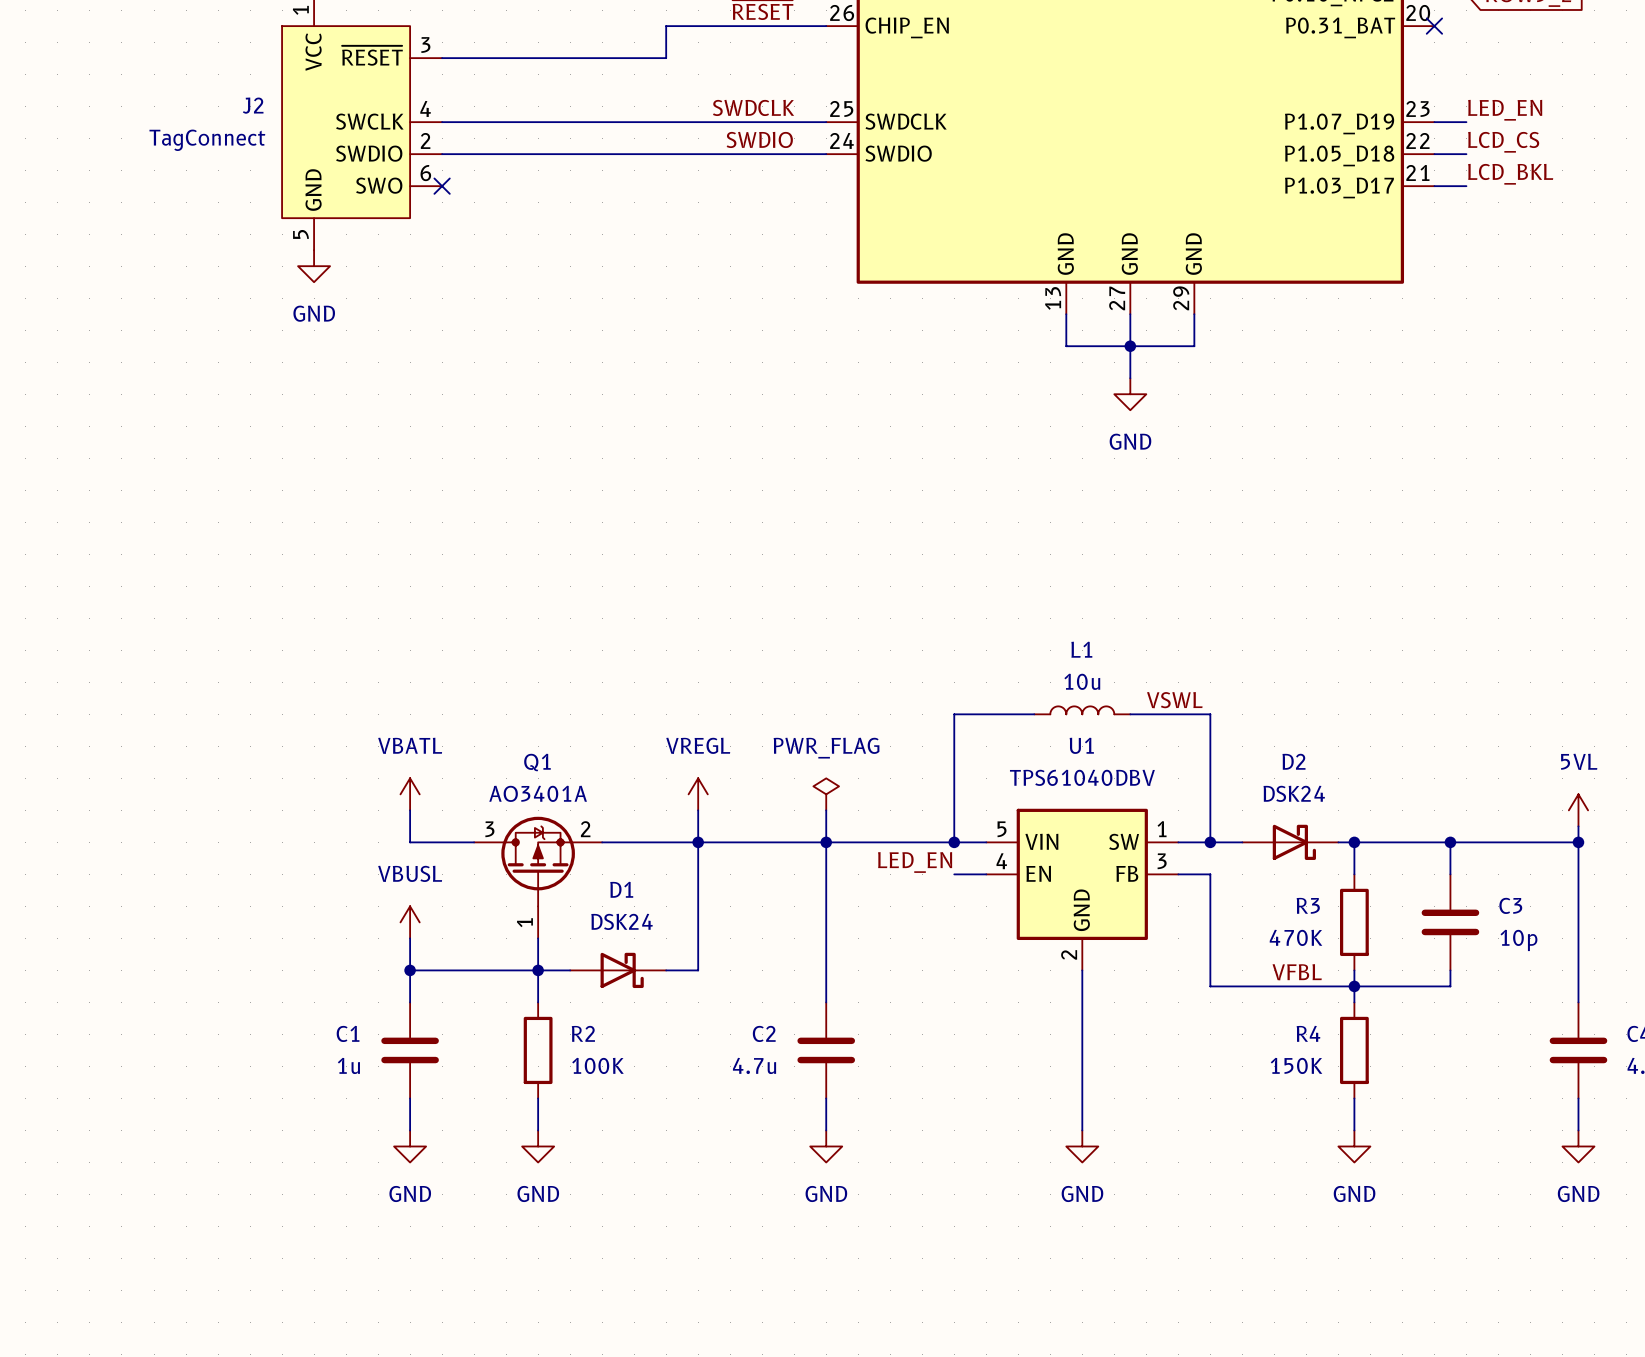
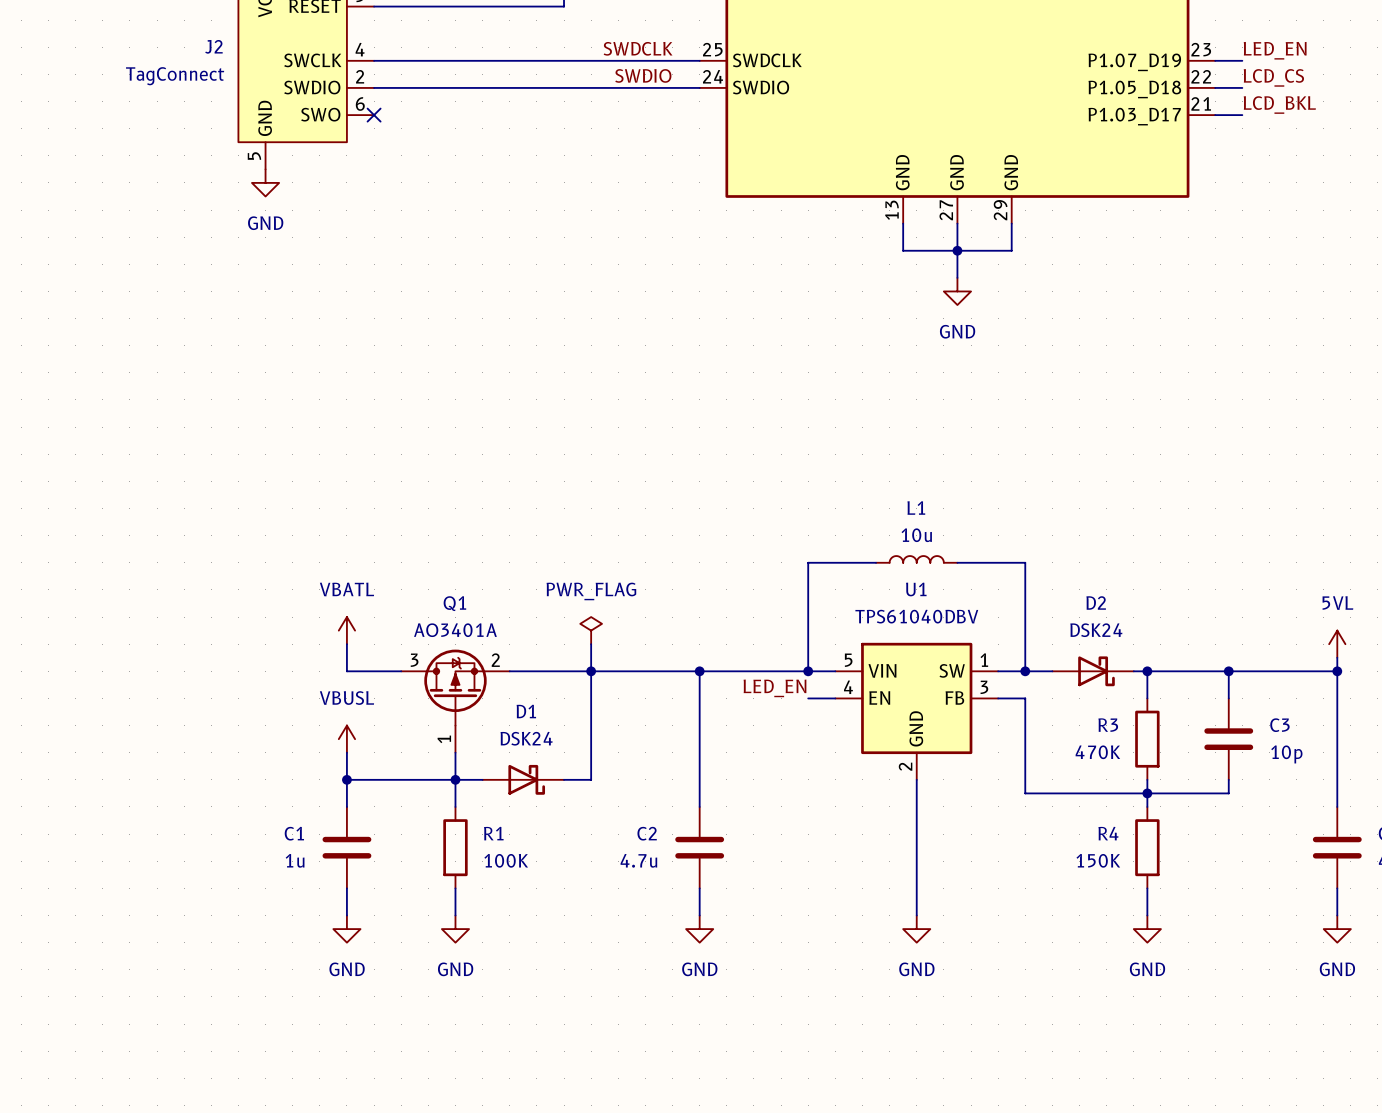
label: VSWL (1174, 700) -> none
power symbol: VREGL (698, 794) -> PWR_FLAG (591, 630)
power symbol: PWR_FLAG (826, 794) -> none
wire: (826, 810) (826, 842) -> none
label: VFBL (1297, 972) -> none
R2 name: R2 (583, 1033) -> R1 (493, 833)

